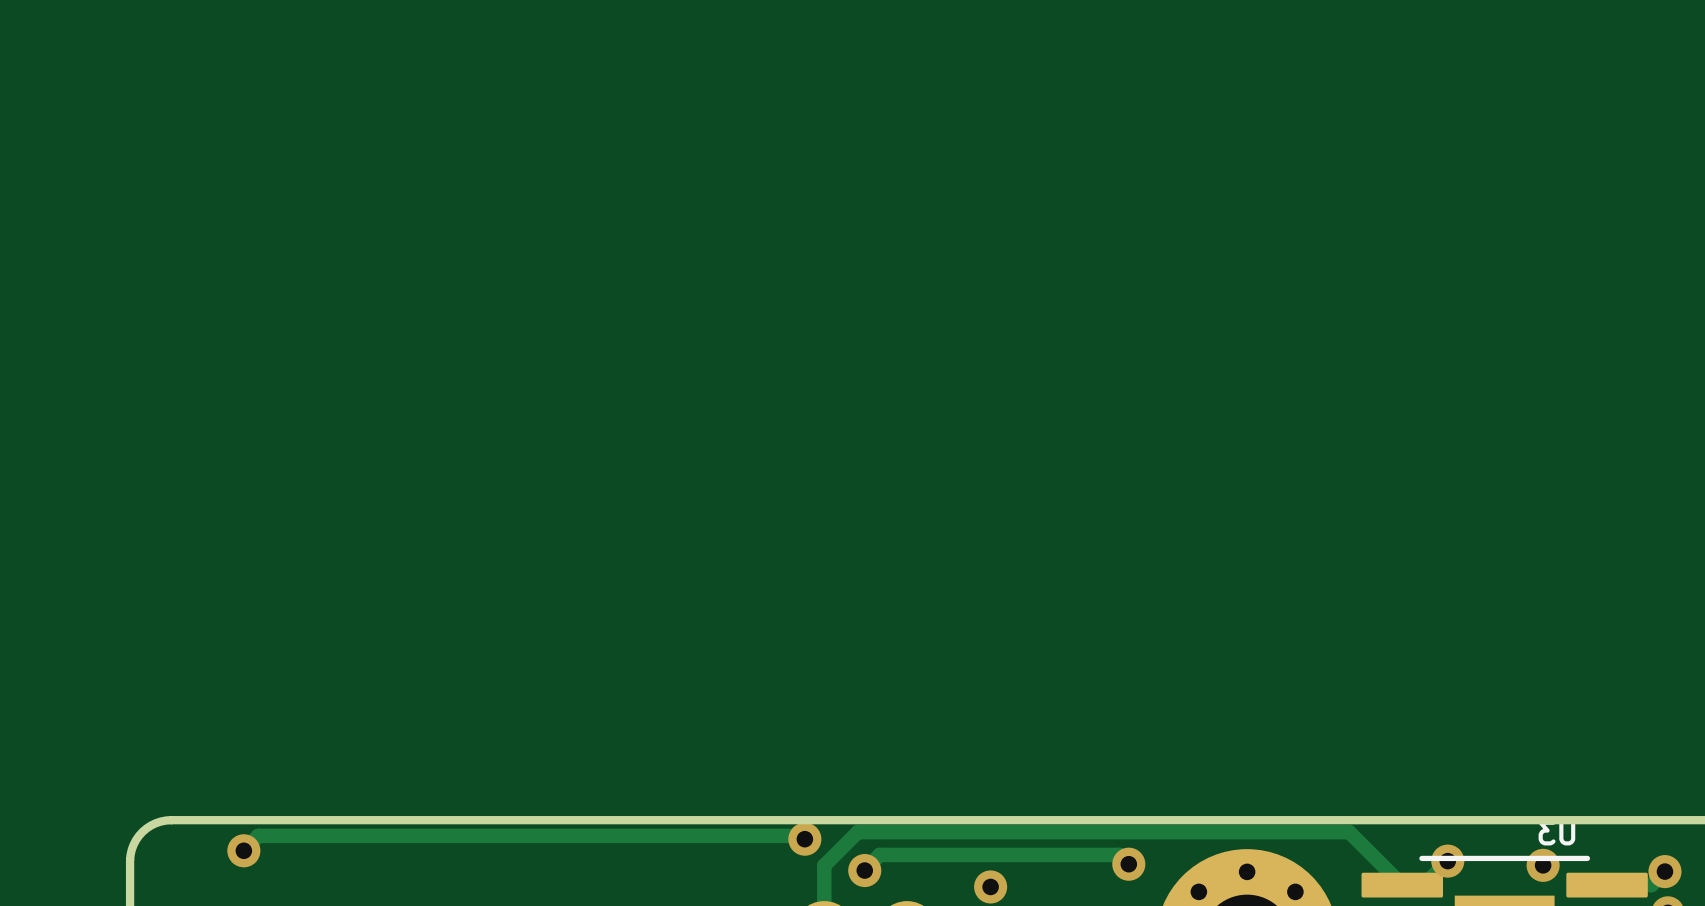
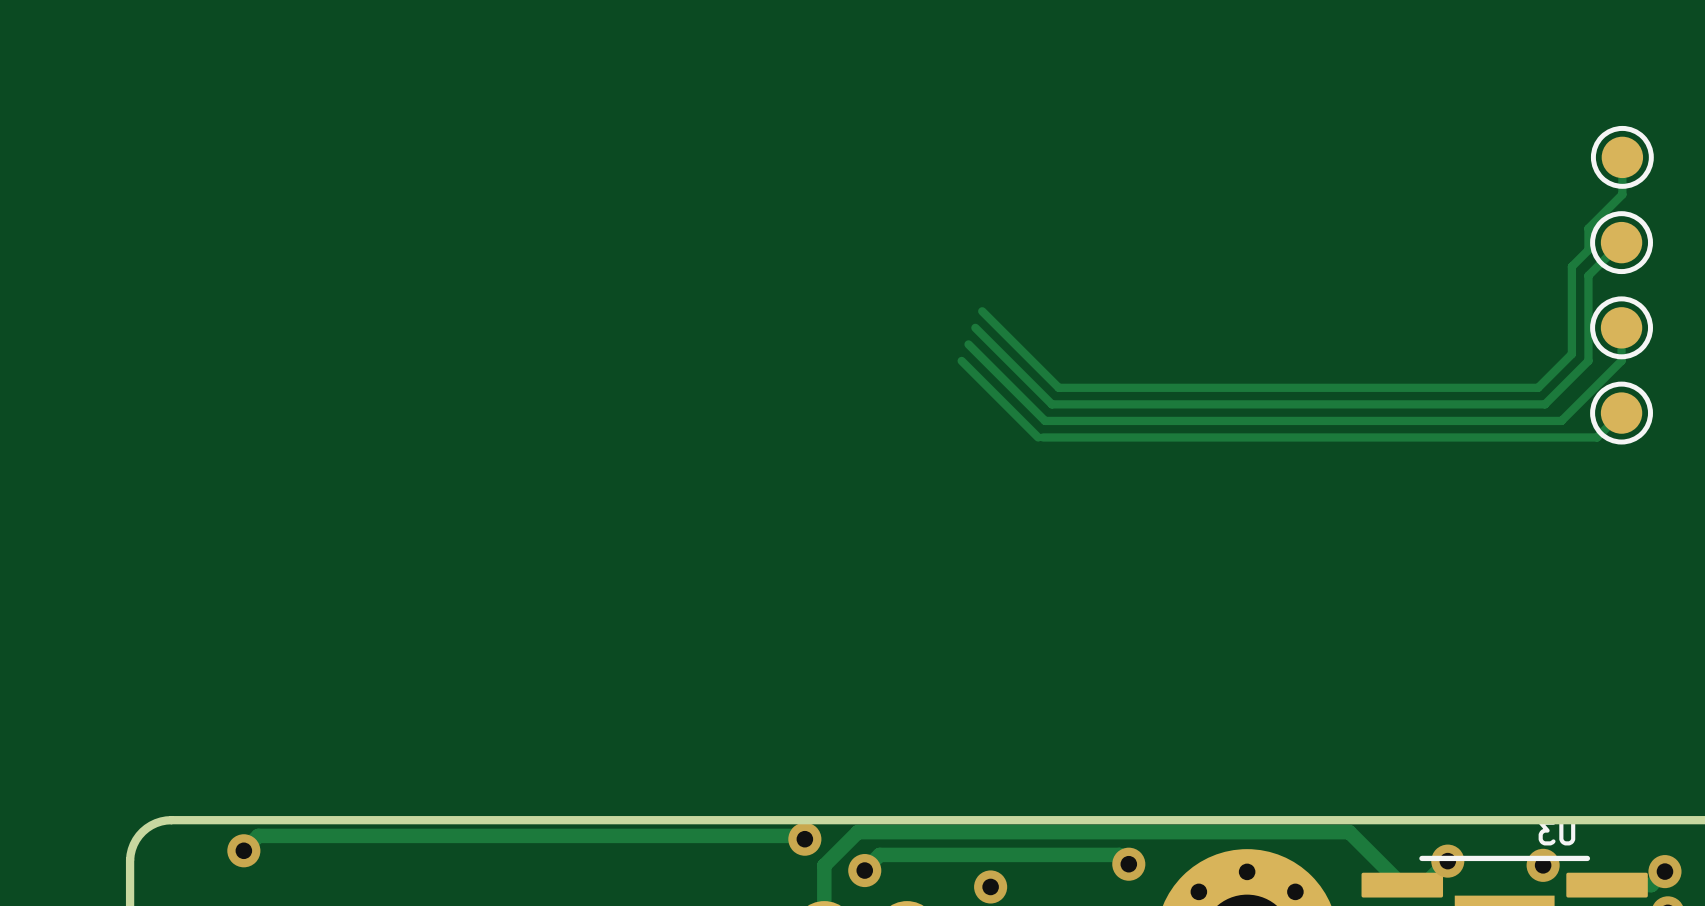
track: none -> (1622, 157) (1622, 194) (1588, 228) (1588, 250) (1571, 266) (1571, 354) (1538, 387) (1058, 387) (982, 311)
part: none -> (1622, 157)
track: none -> (1621, 242) (1588, 275) (1588, 360) (1545, 404) (1051, 404) (975, 327)
part: none -> (1621, 242)
track: none -> (1621, 327) (1621, 360) (1561, 420) (1045, 420) (968, 344)
part: none -> (1621, 327)
track: none -> (961, 360) (1038, 437)
track: none -> (1621, 413) (1597, 437) (1043, 437)
part: none -> (1621, 413)

